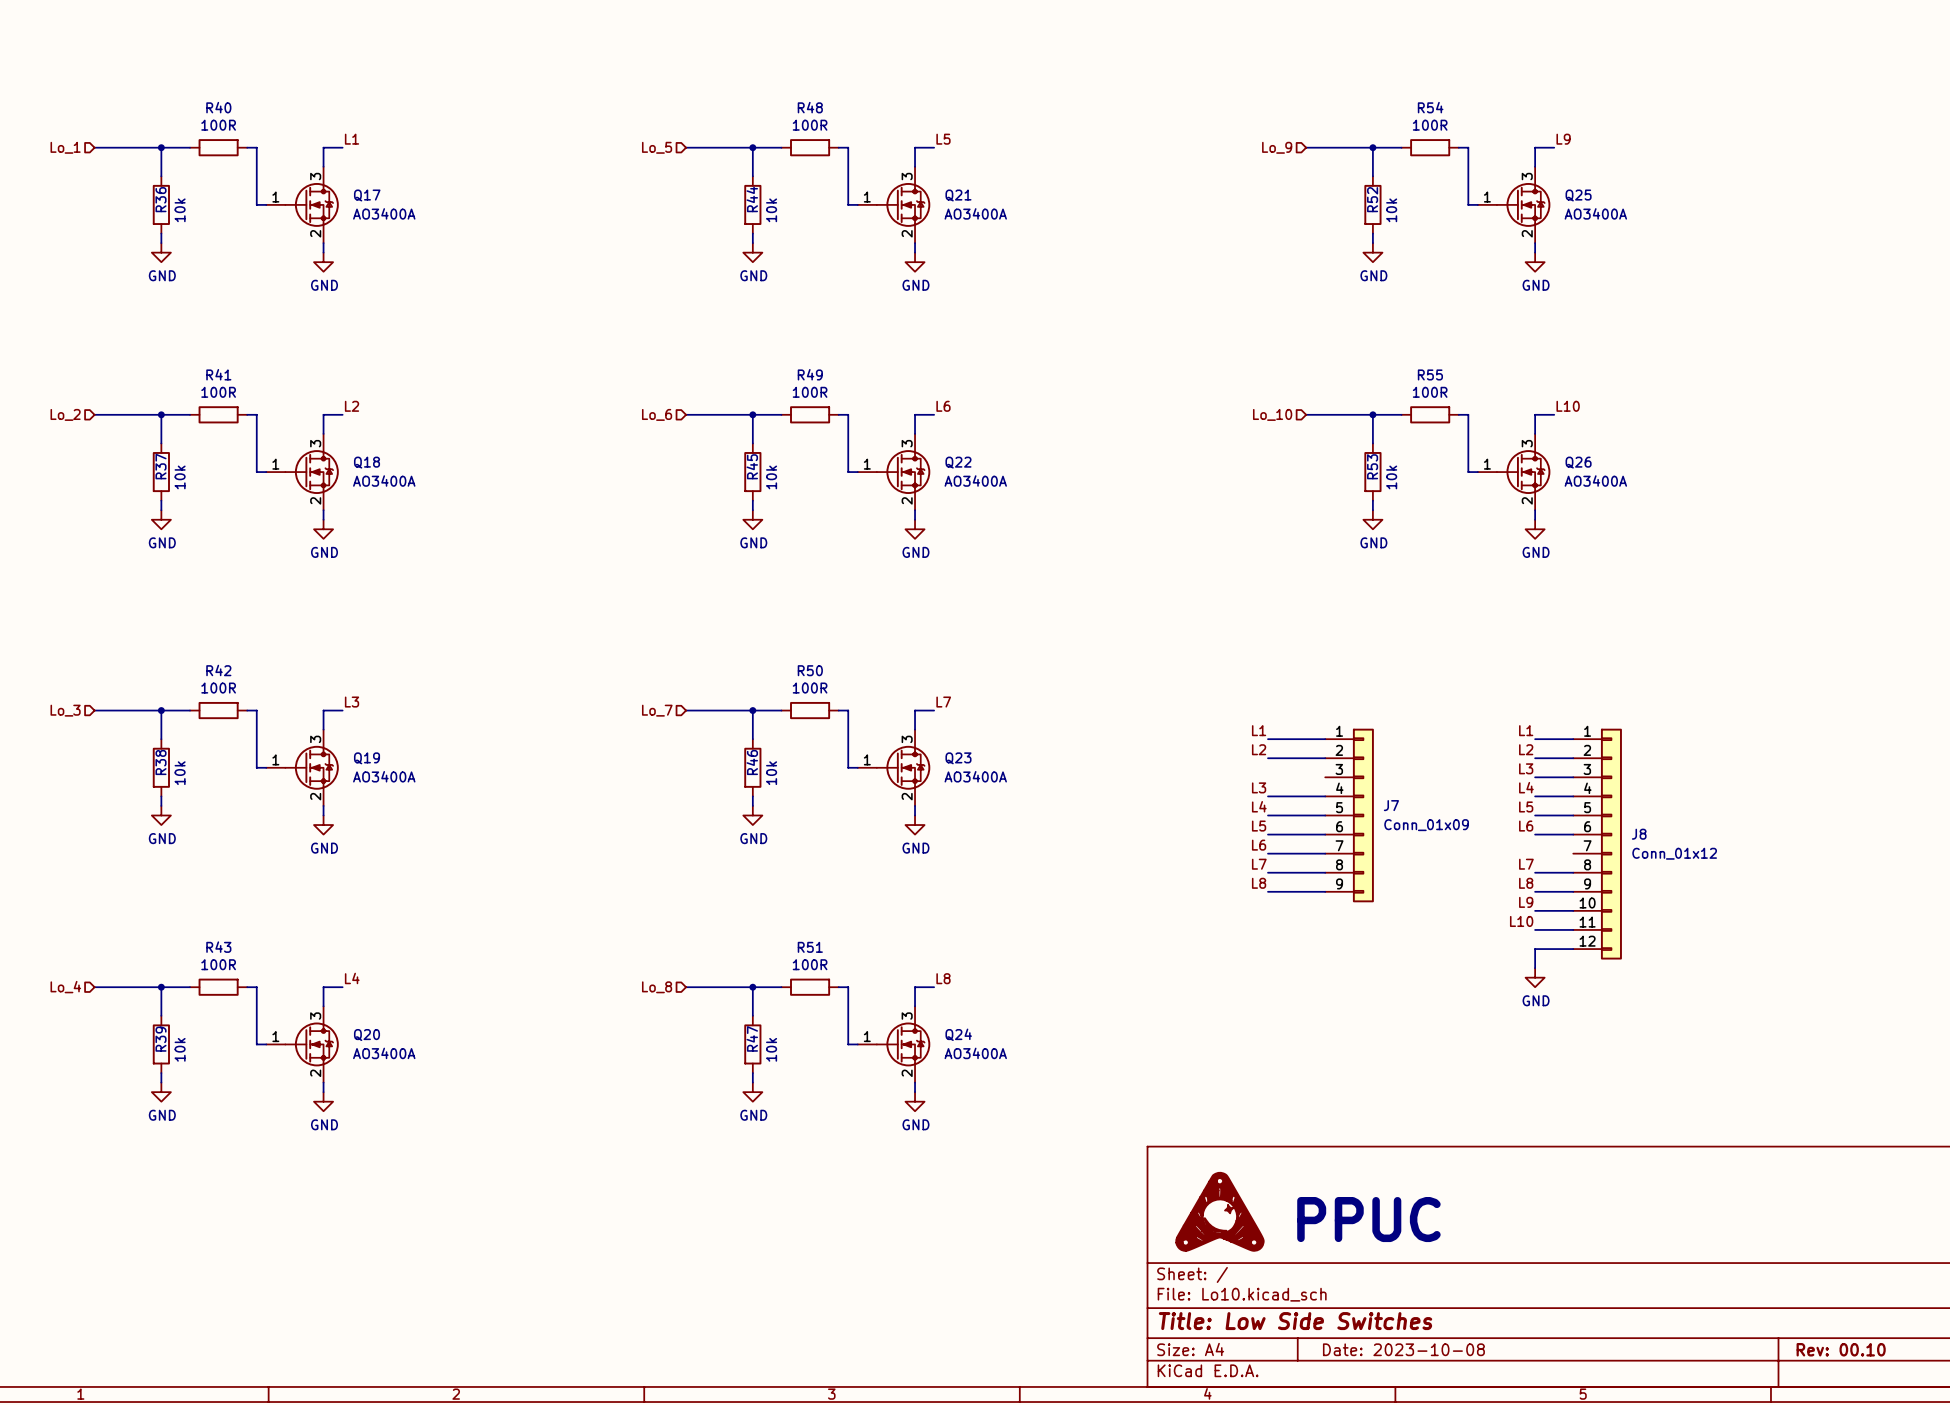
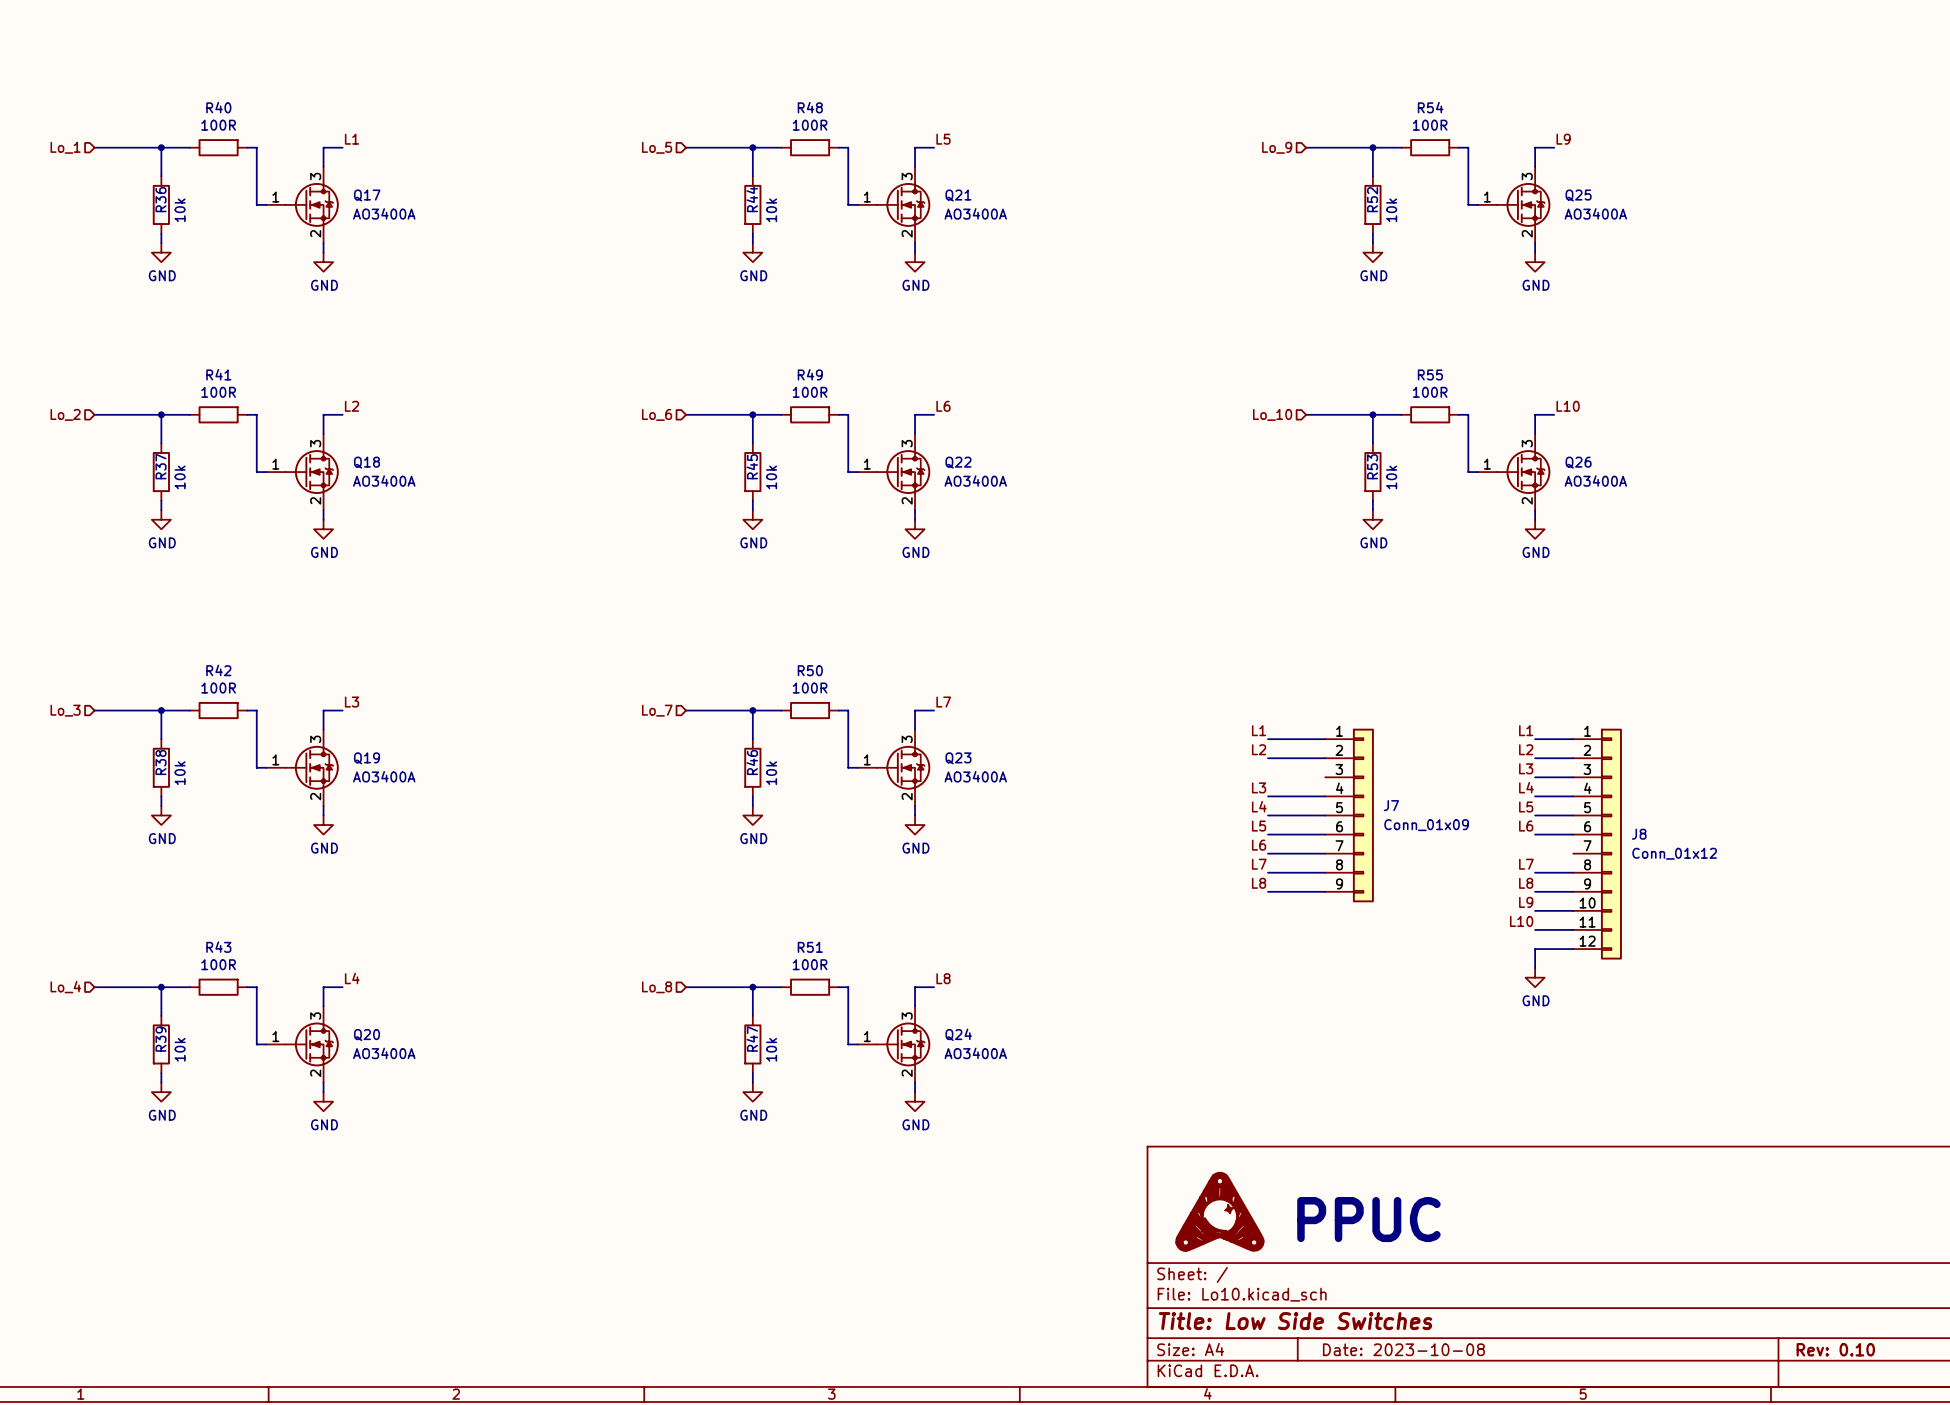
title block: Rev: 00.10 (1841, 1349) -> Rev: 0.10 (1835, 1349)

